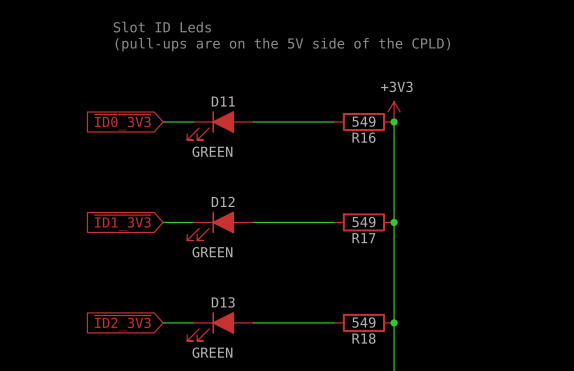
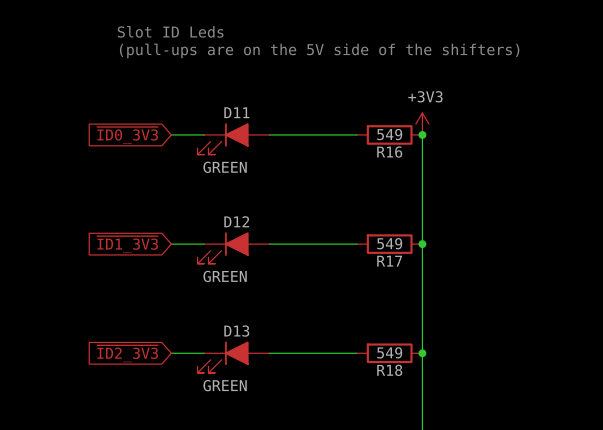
text: (pull-ups are on the 5V side of the CPLD) (282, 44) -> (pull-ups are on the 5V side of the shifters) (319, 50)

